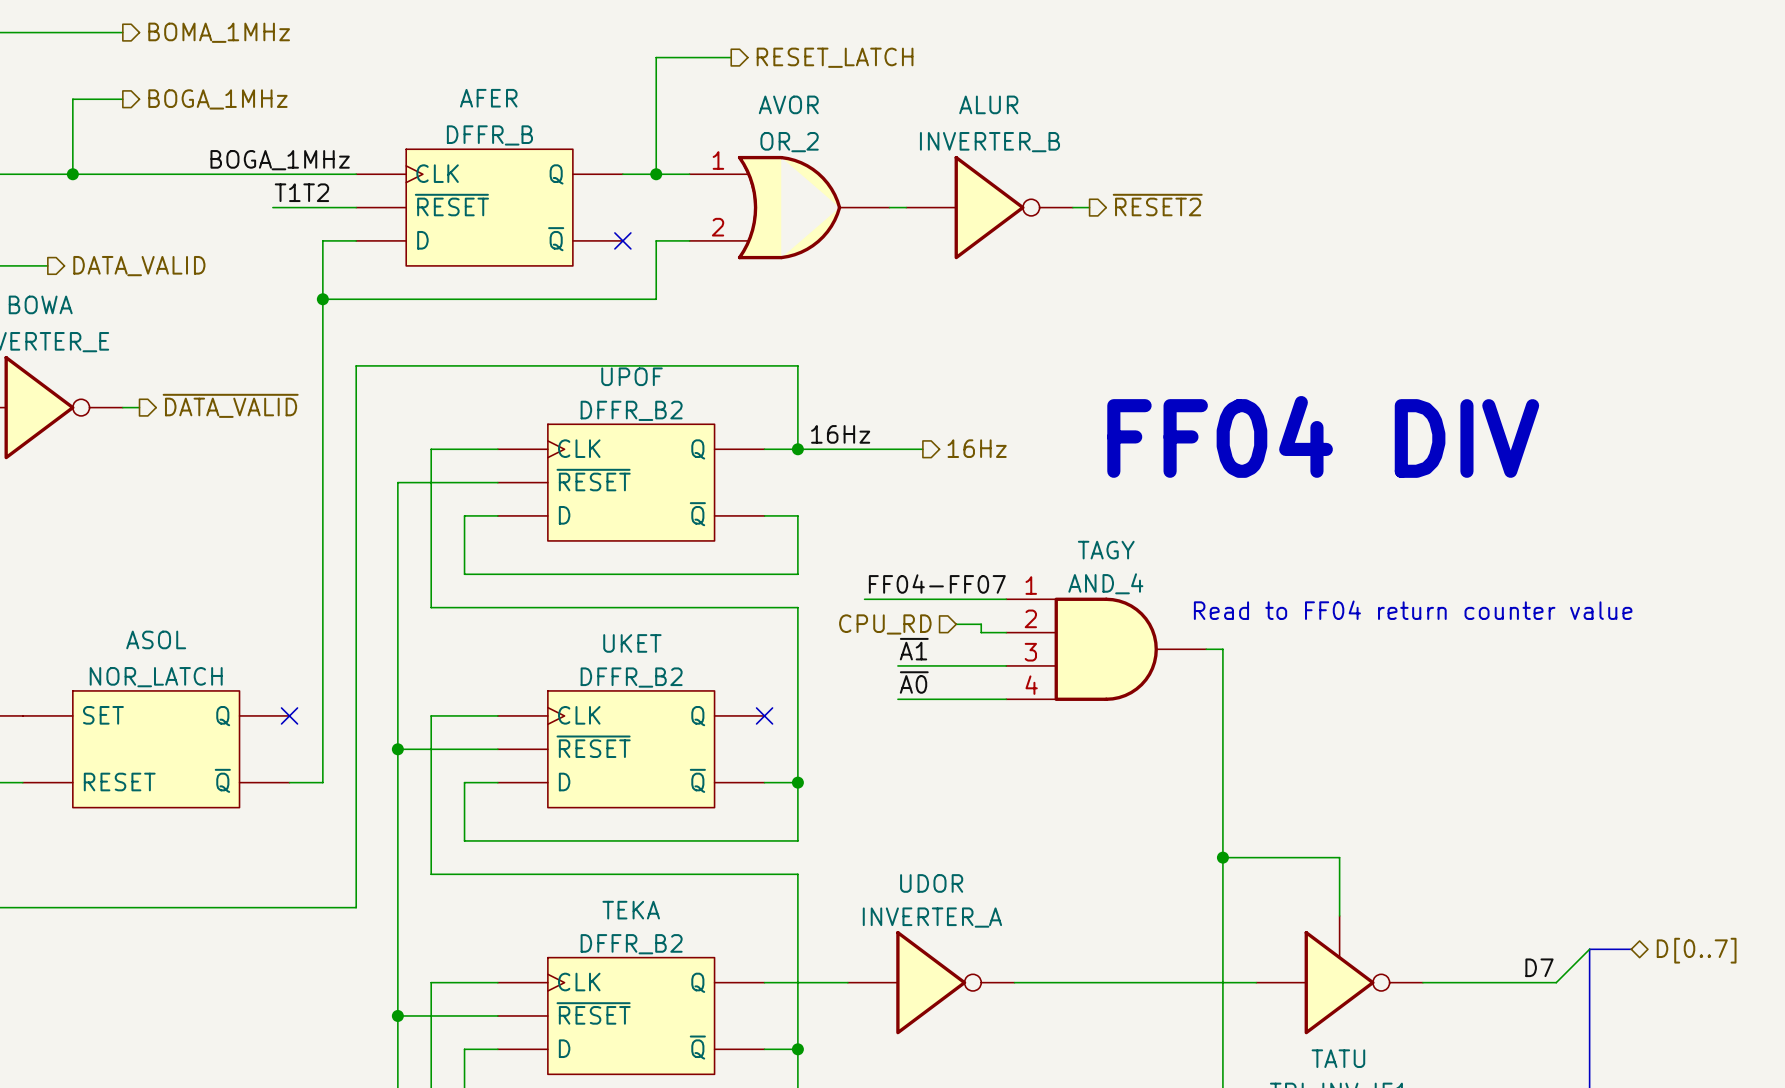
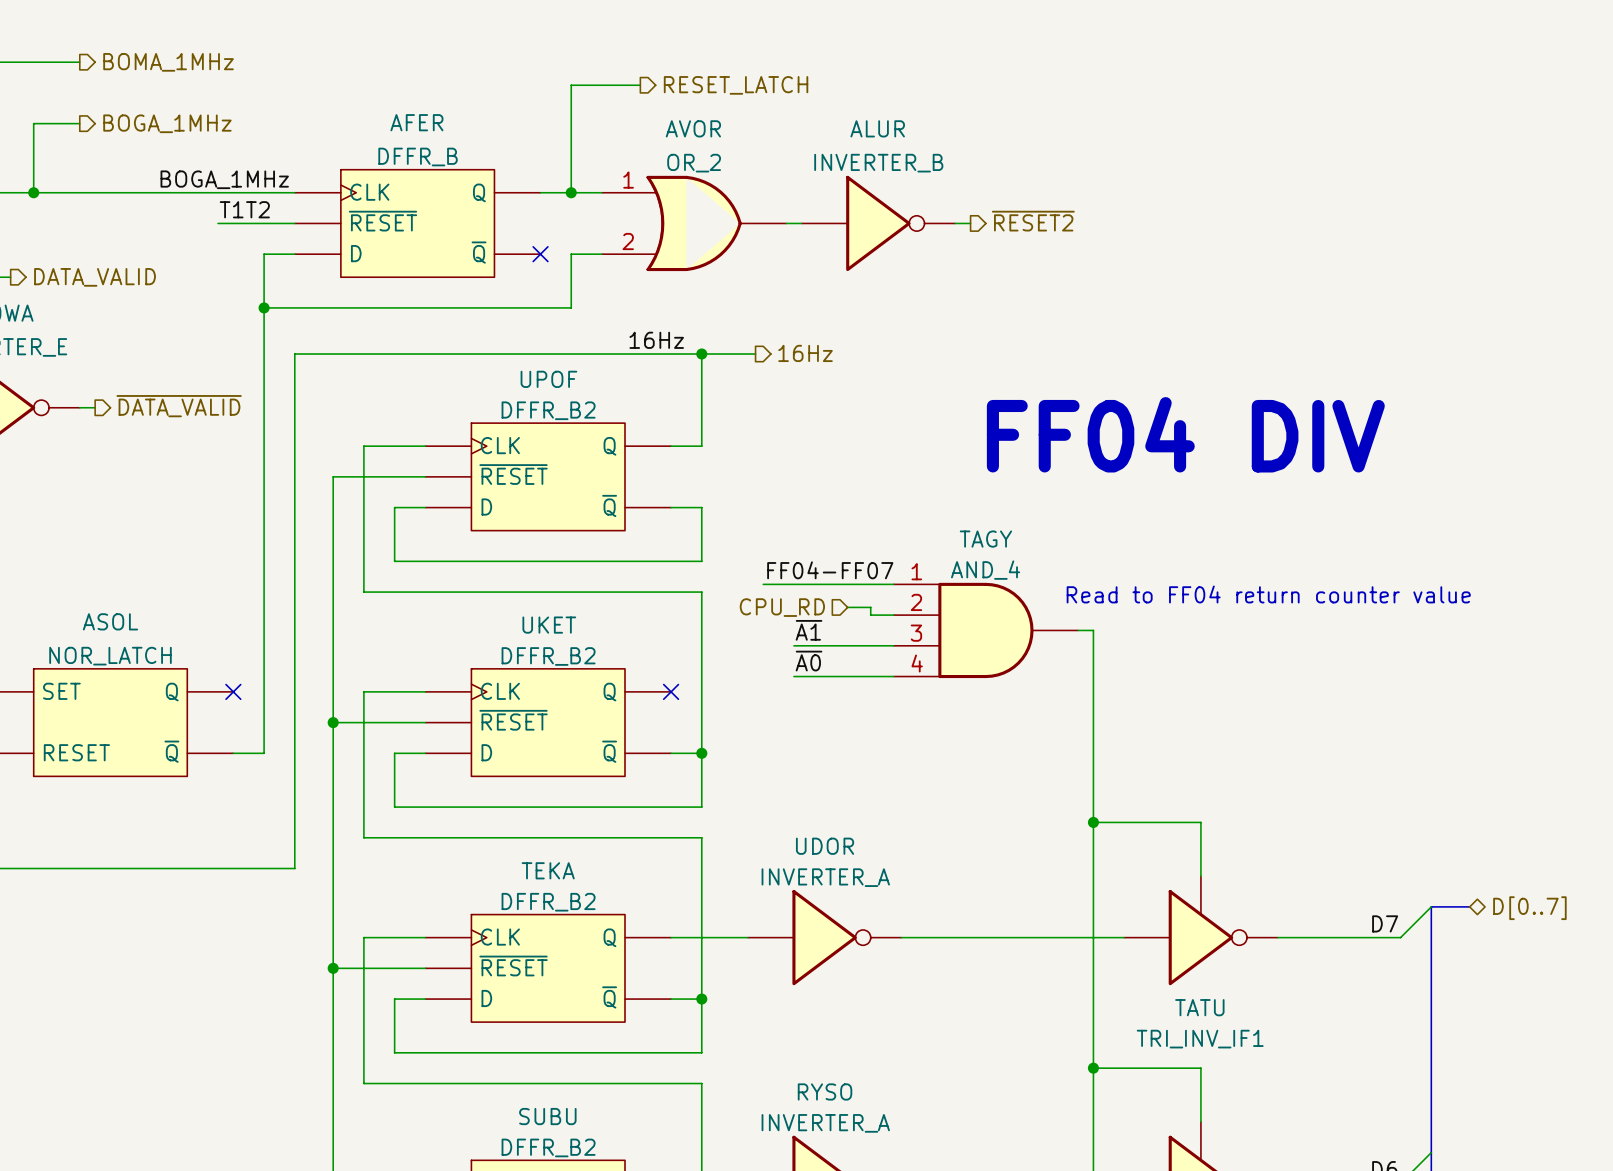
wire: none -> (701, 354) (701, 369)
junction: none -> (701, 354)
wire: (356, 365) (797, 365) -> (294, 369) (294, 354) (755, 354)
label position: 16Hz (840, 434) -> 16Hz (656, 340)
hierarchical label position: 16Hz (977, 448) -> 16Hz (805, 353)
wire: (797, 449) (922, 449) -> none
junction: (797, 449) -> none

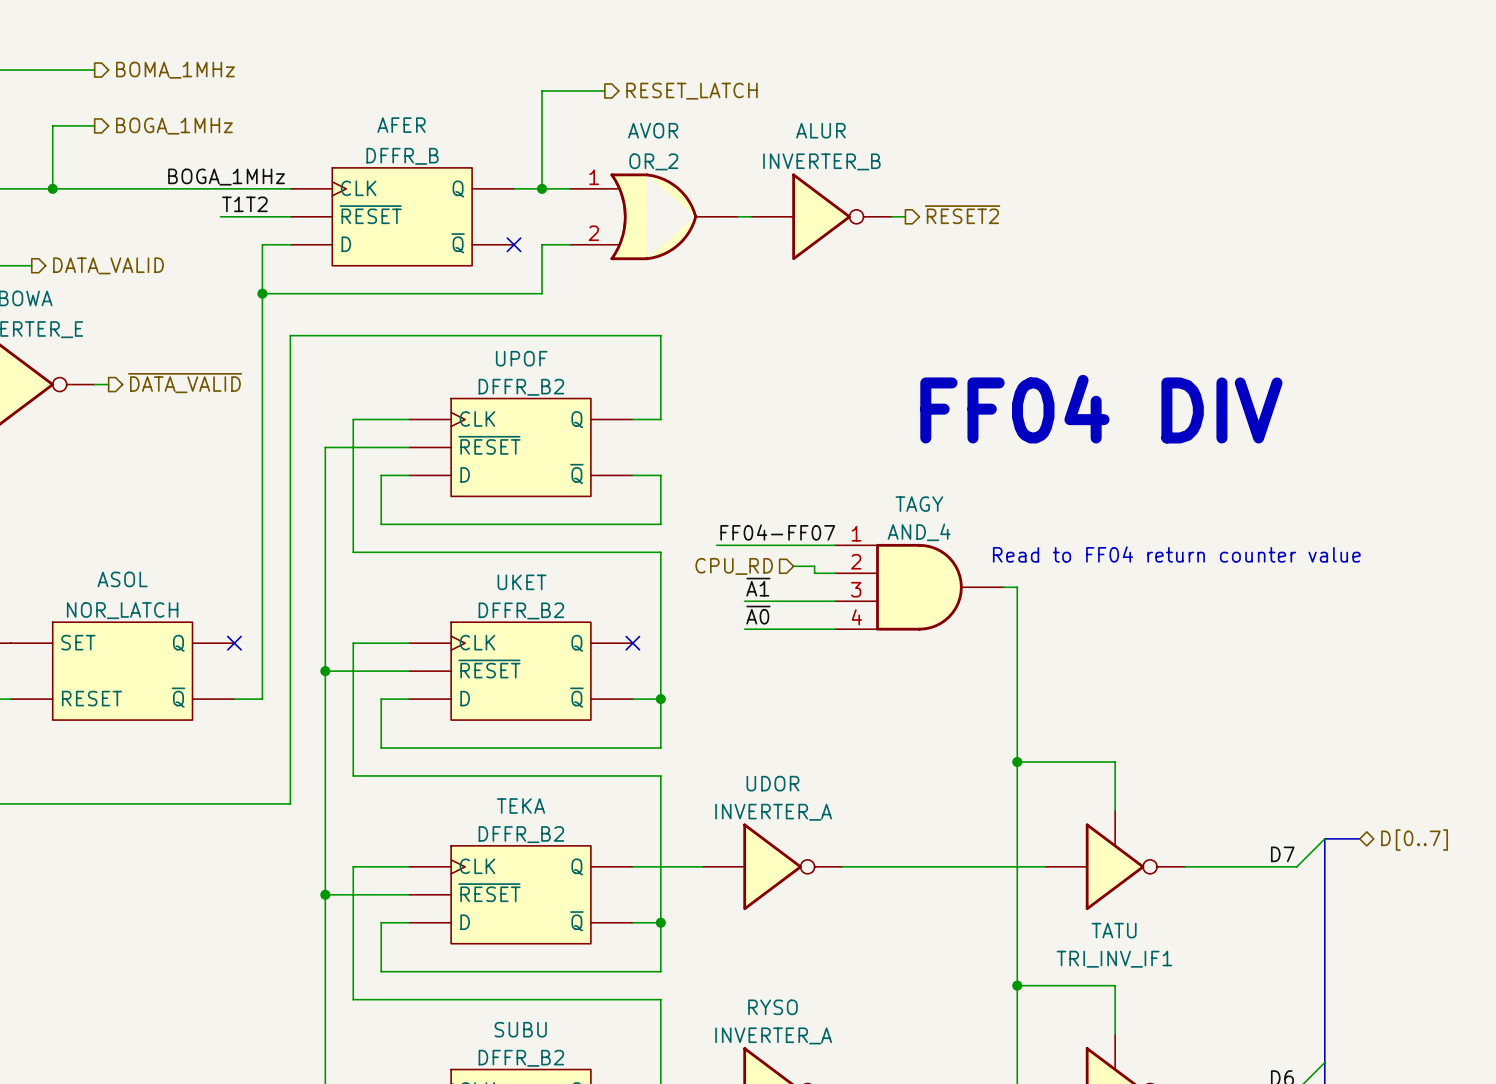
label: 16Hz (656, 340) -> none
hierarchical label: 16Hz (805, 353) -> none
wire: (701, 354) (755, 354) -> none
junction: (701, 354) -> none

